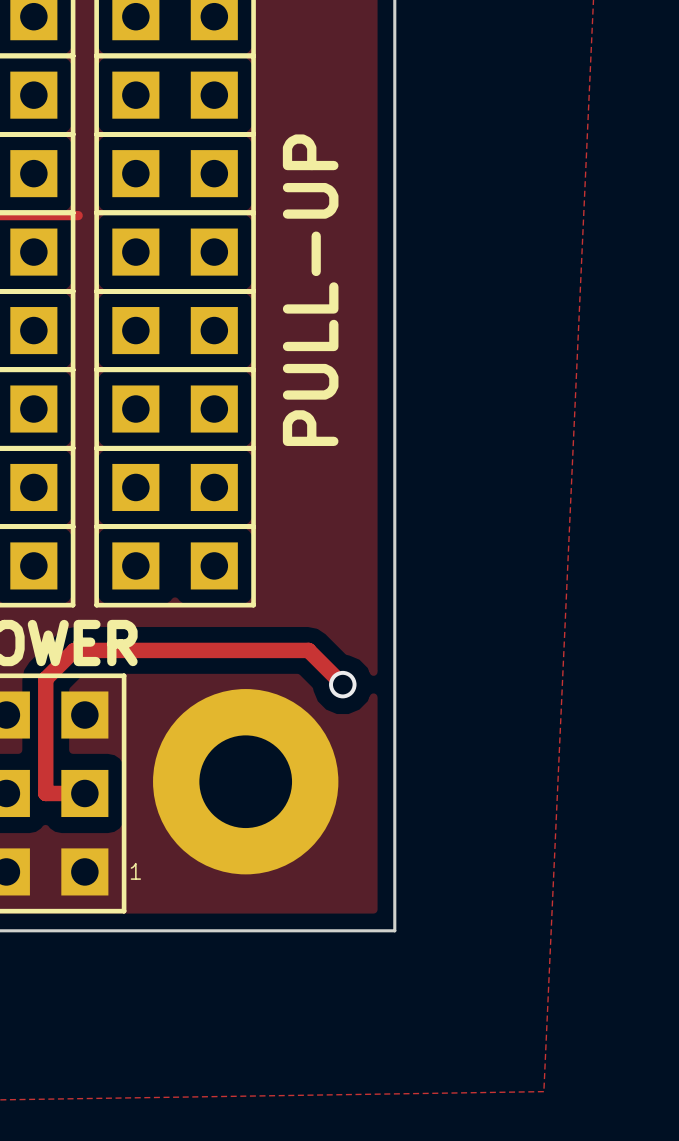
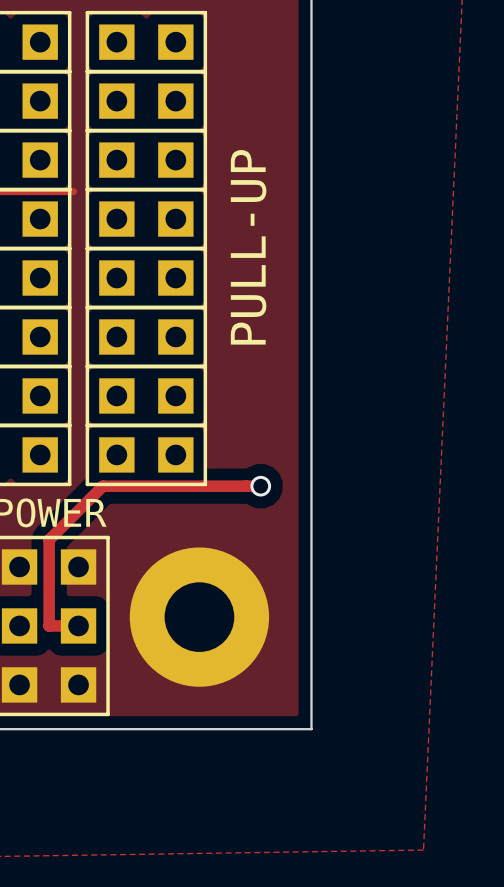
track: (74, 650) (308, 650) (342, 684) -> (70, 518) (102, 486) (260, 486)
via position: (342, 684) -> (260, 486)
part text: 1 (135, 871) -> none

